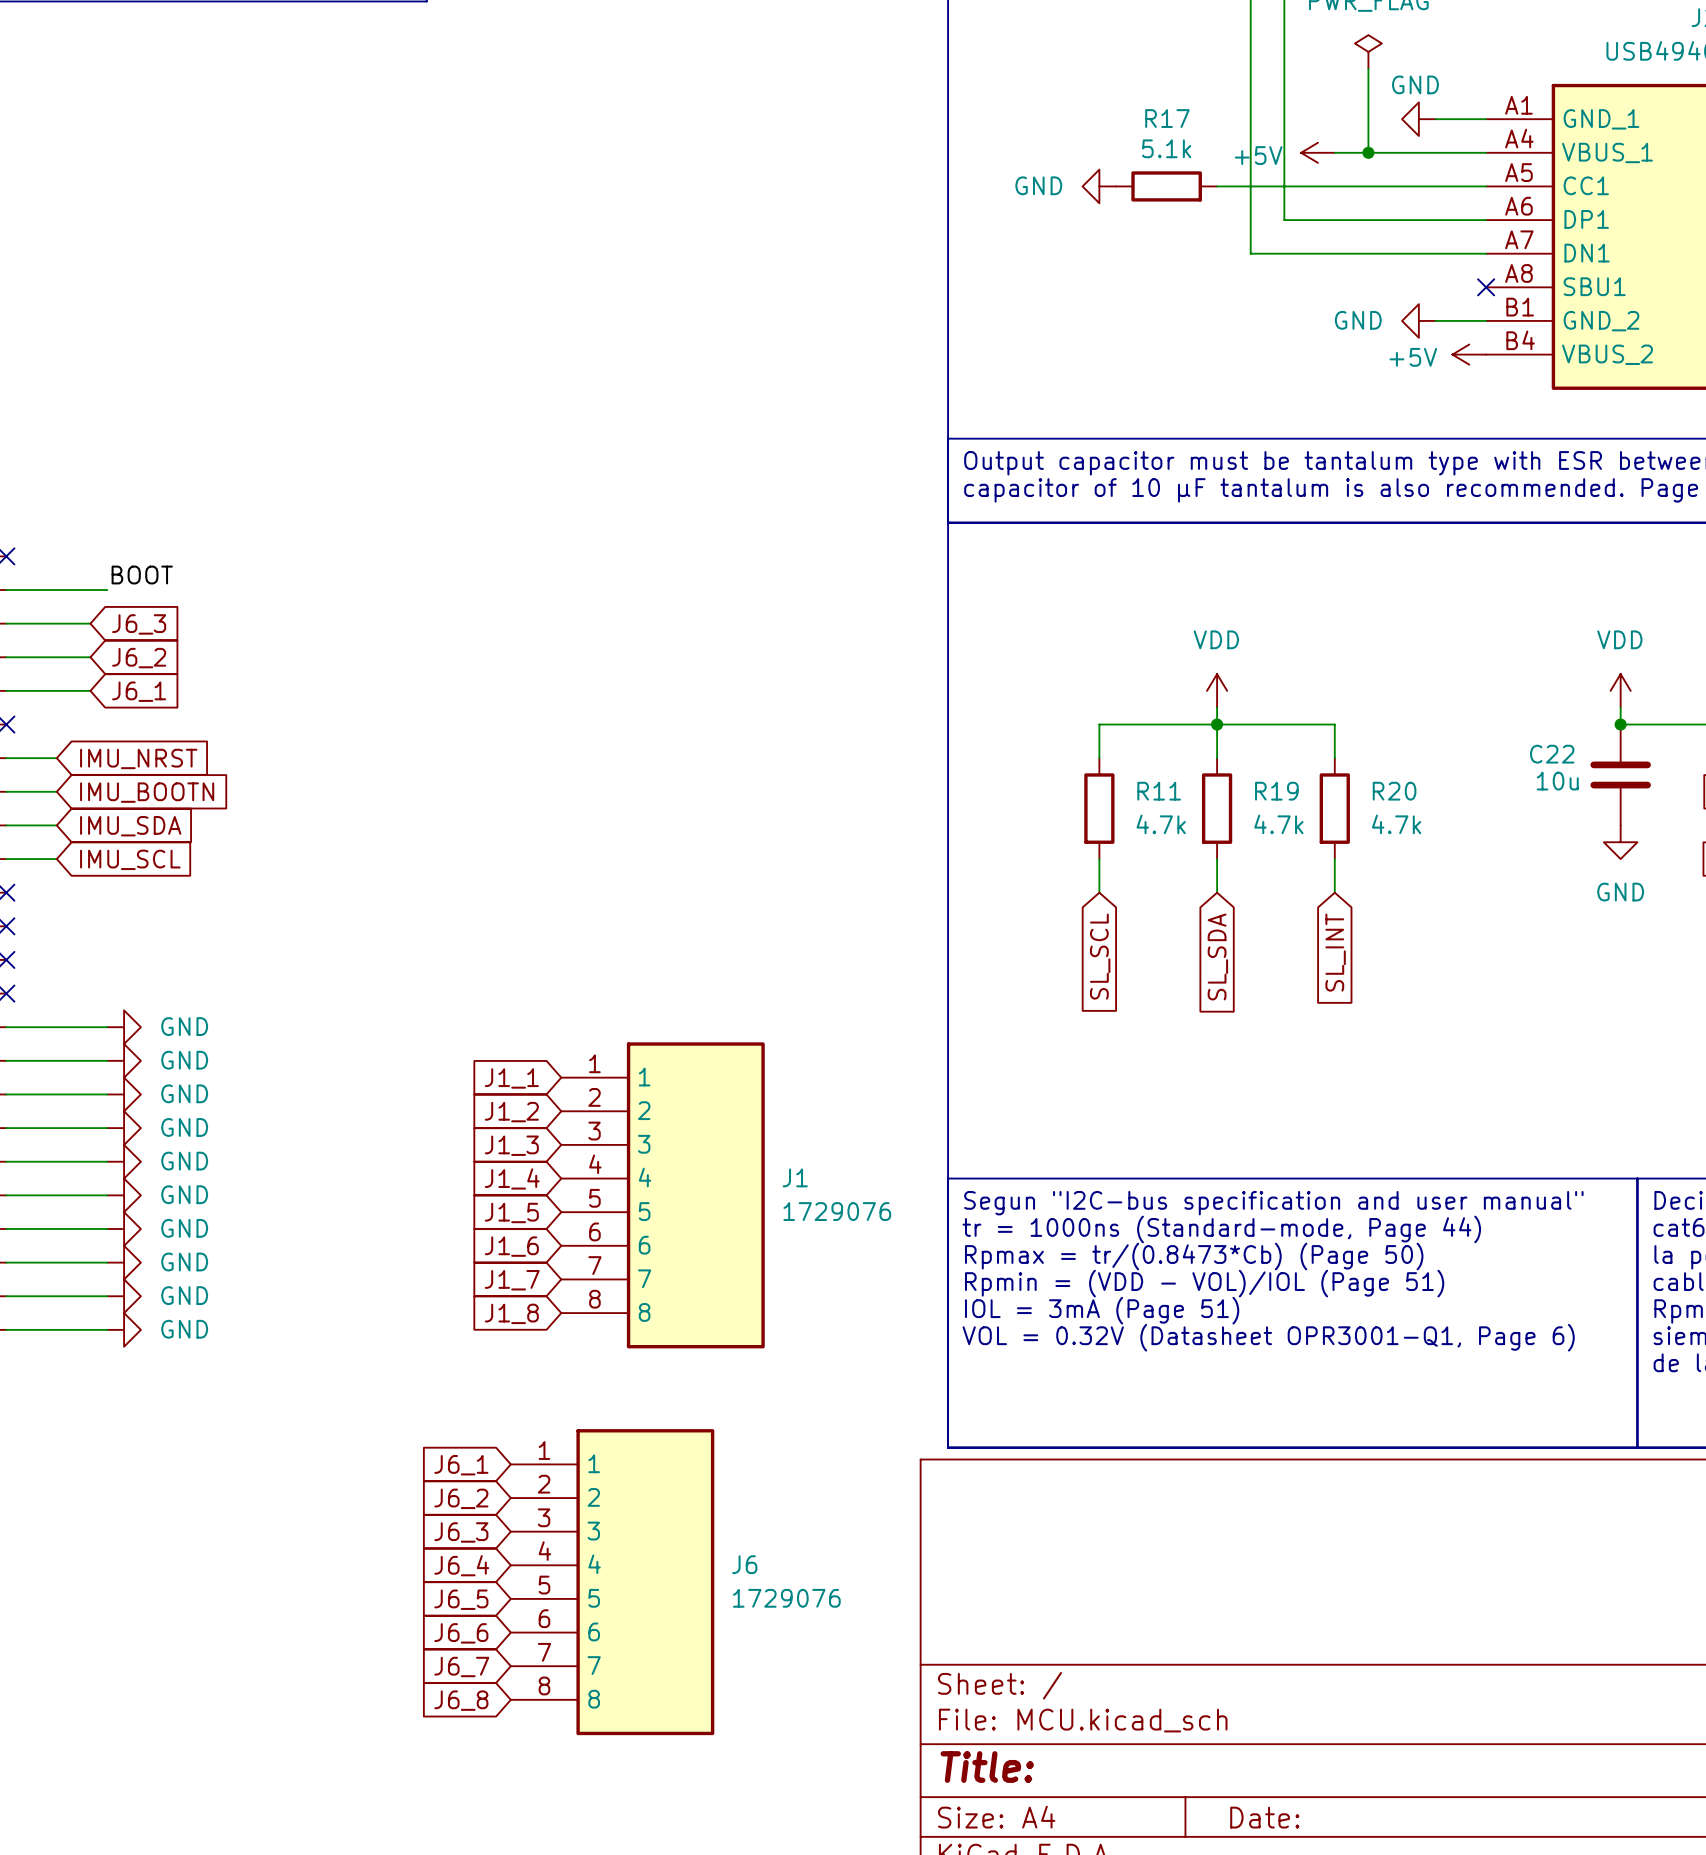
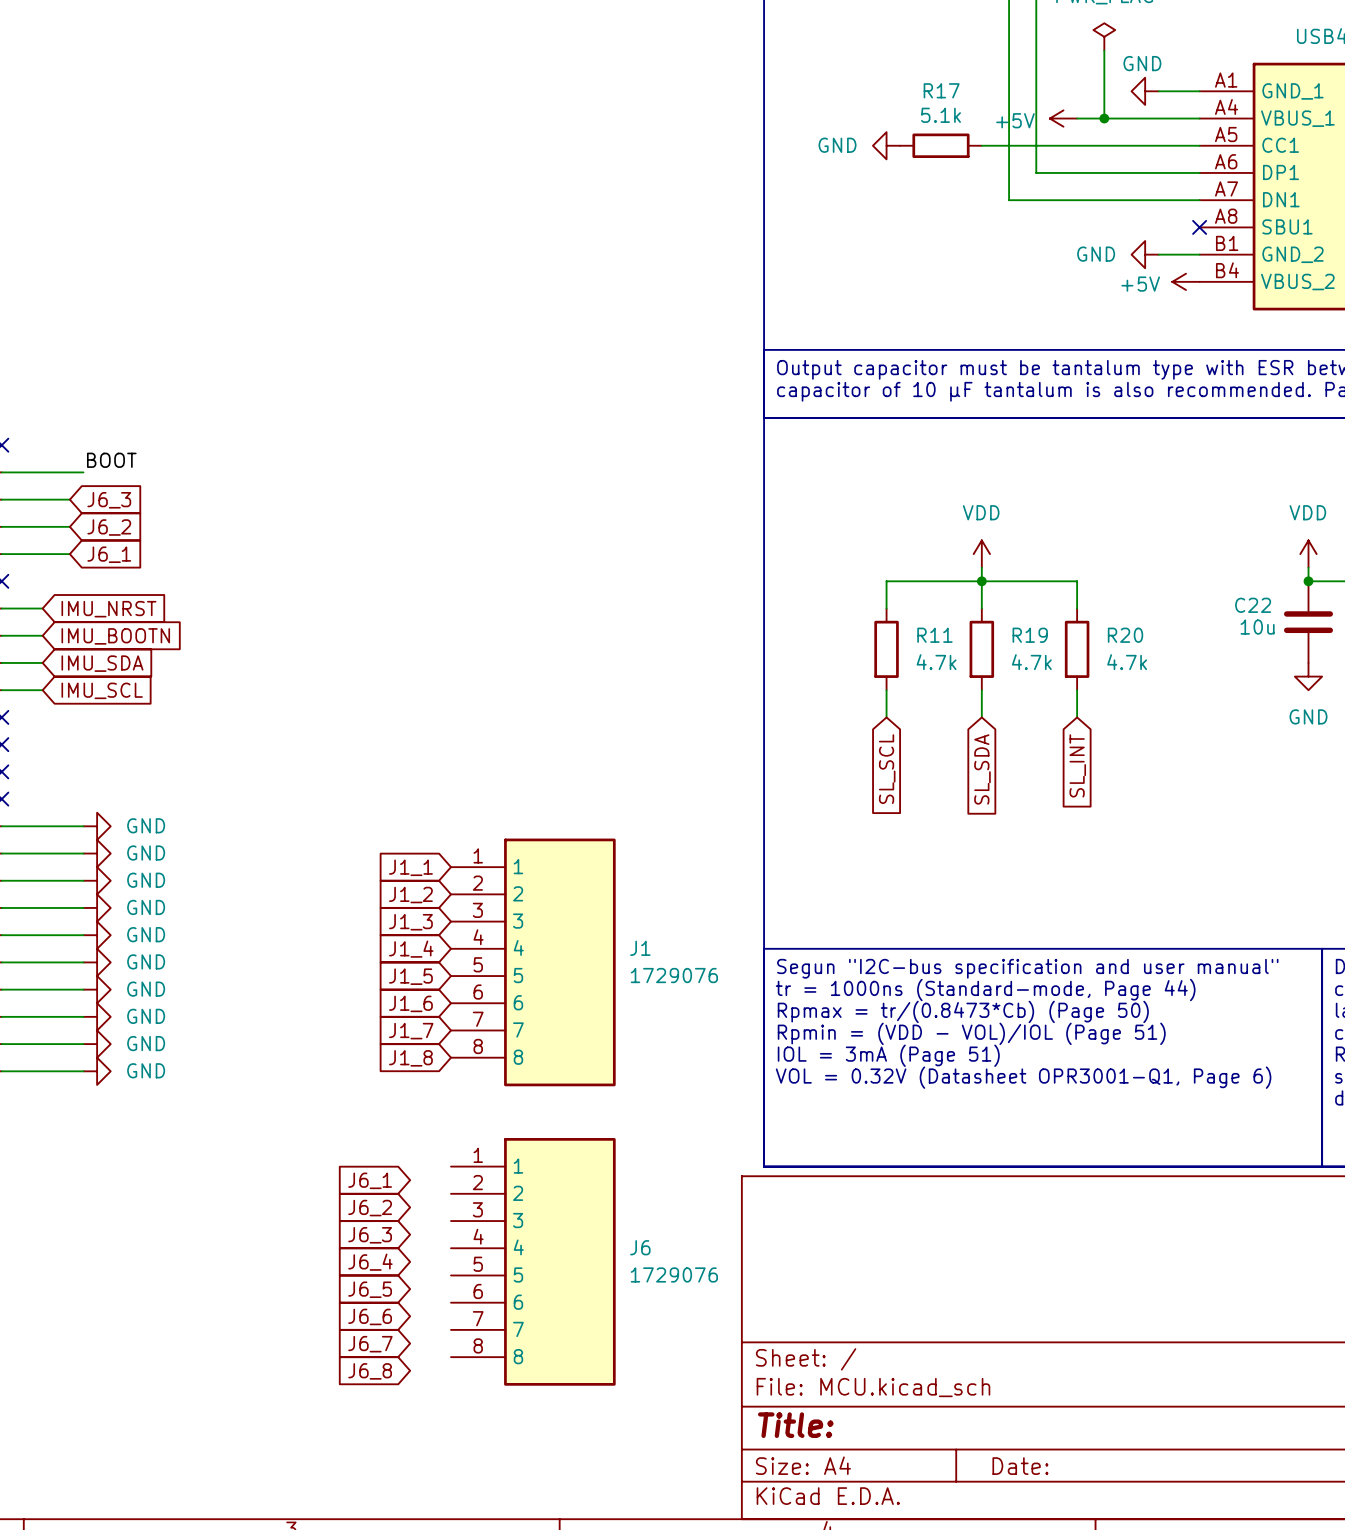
J6 position: (612, 1582) -> (533, 1261)

